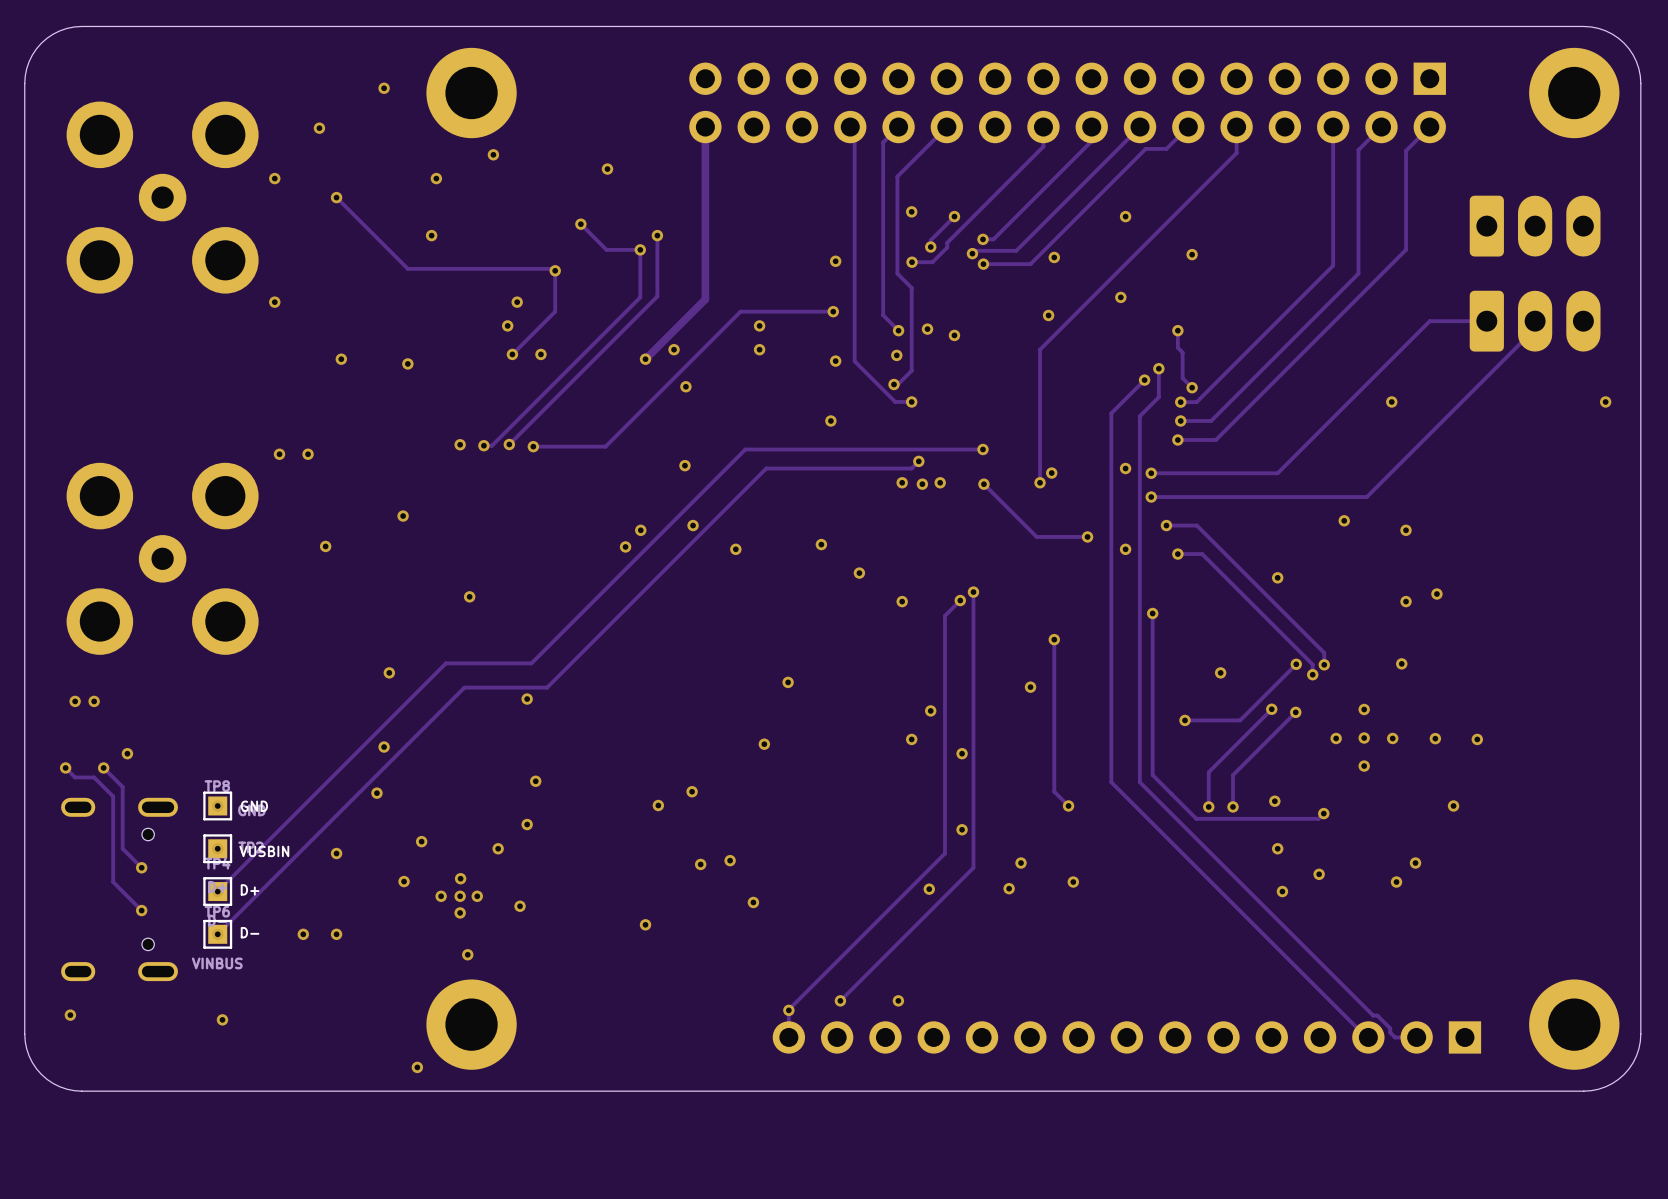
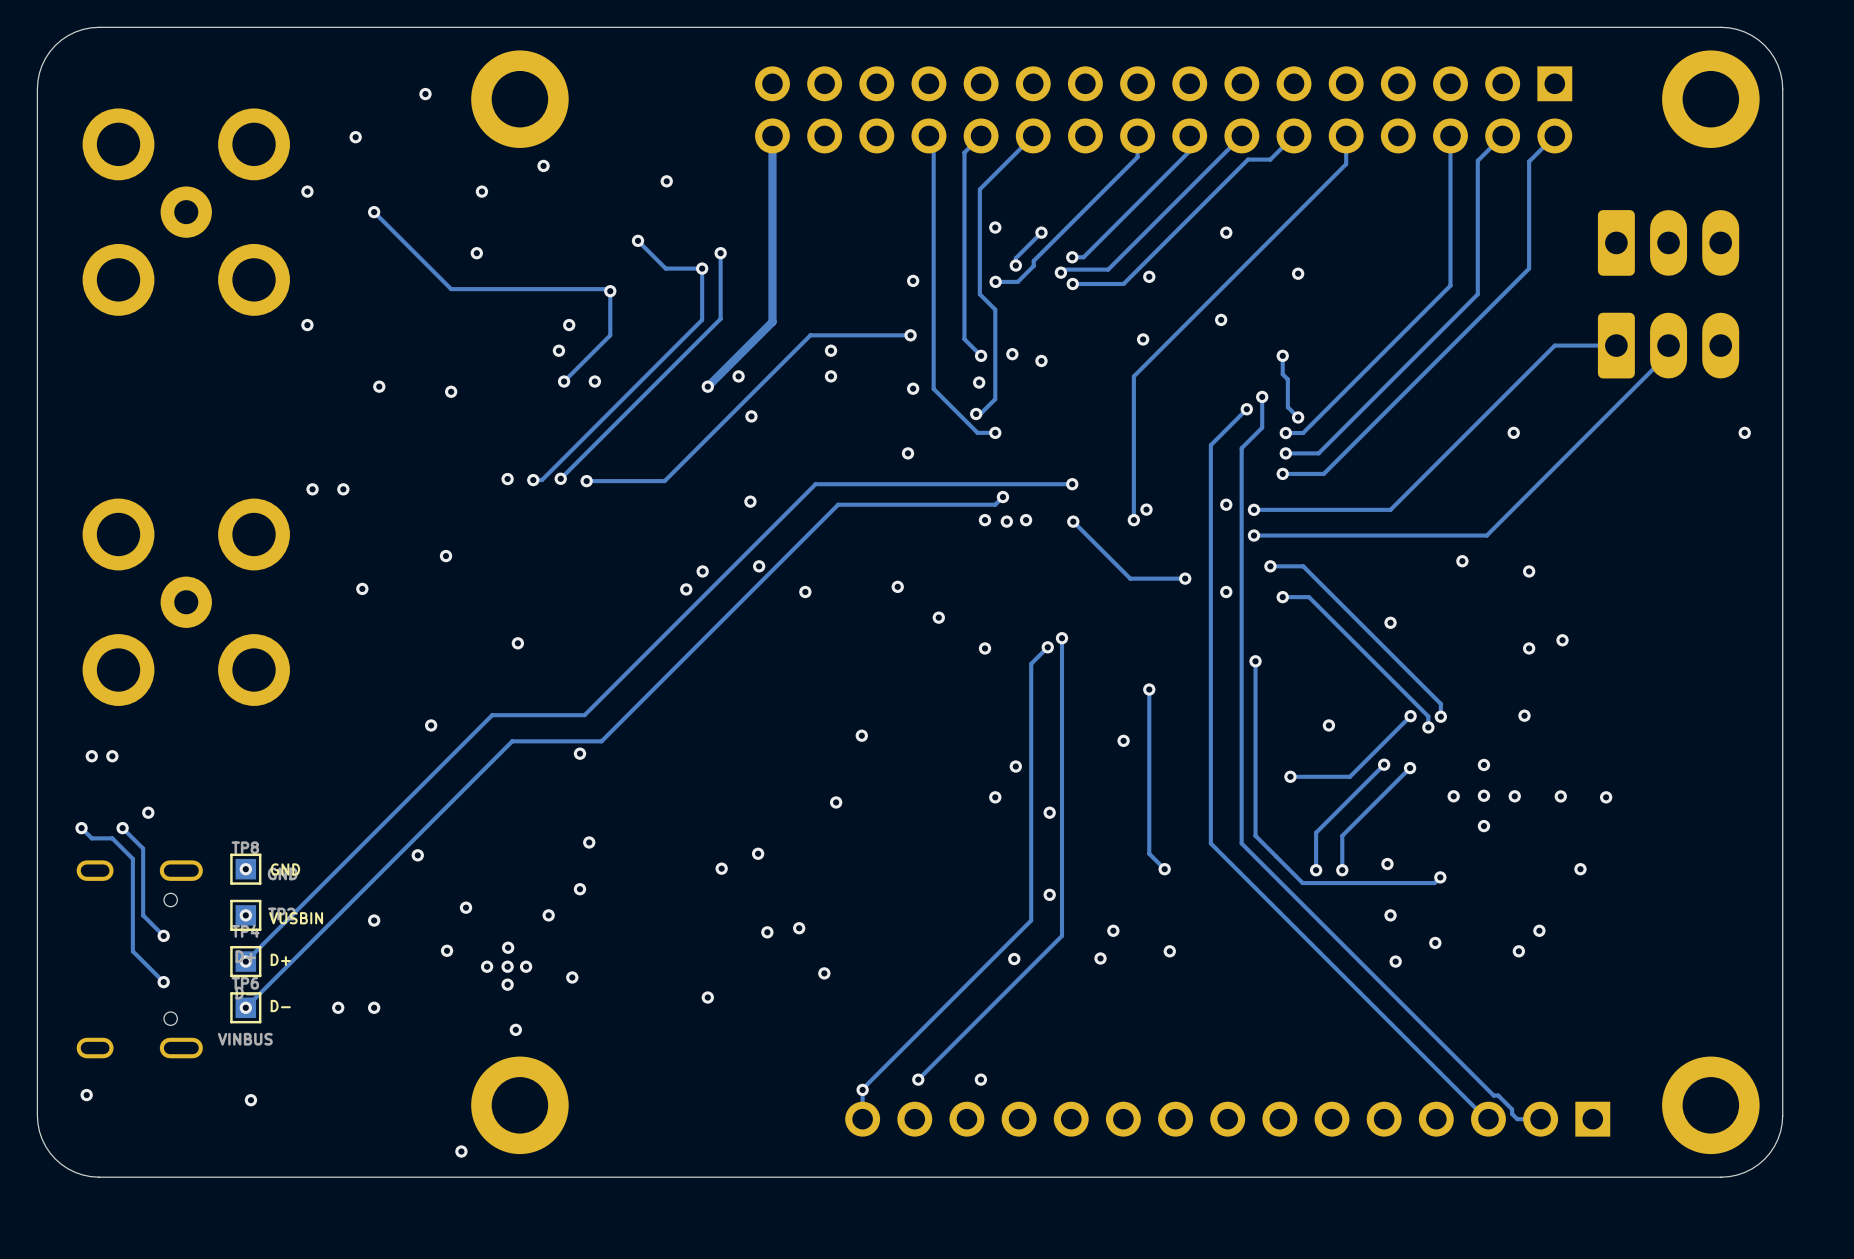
via: (384, 747) -> none

